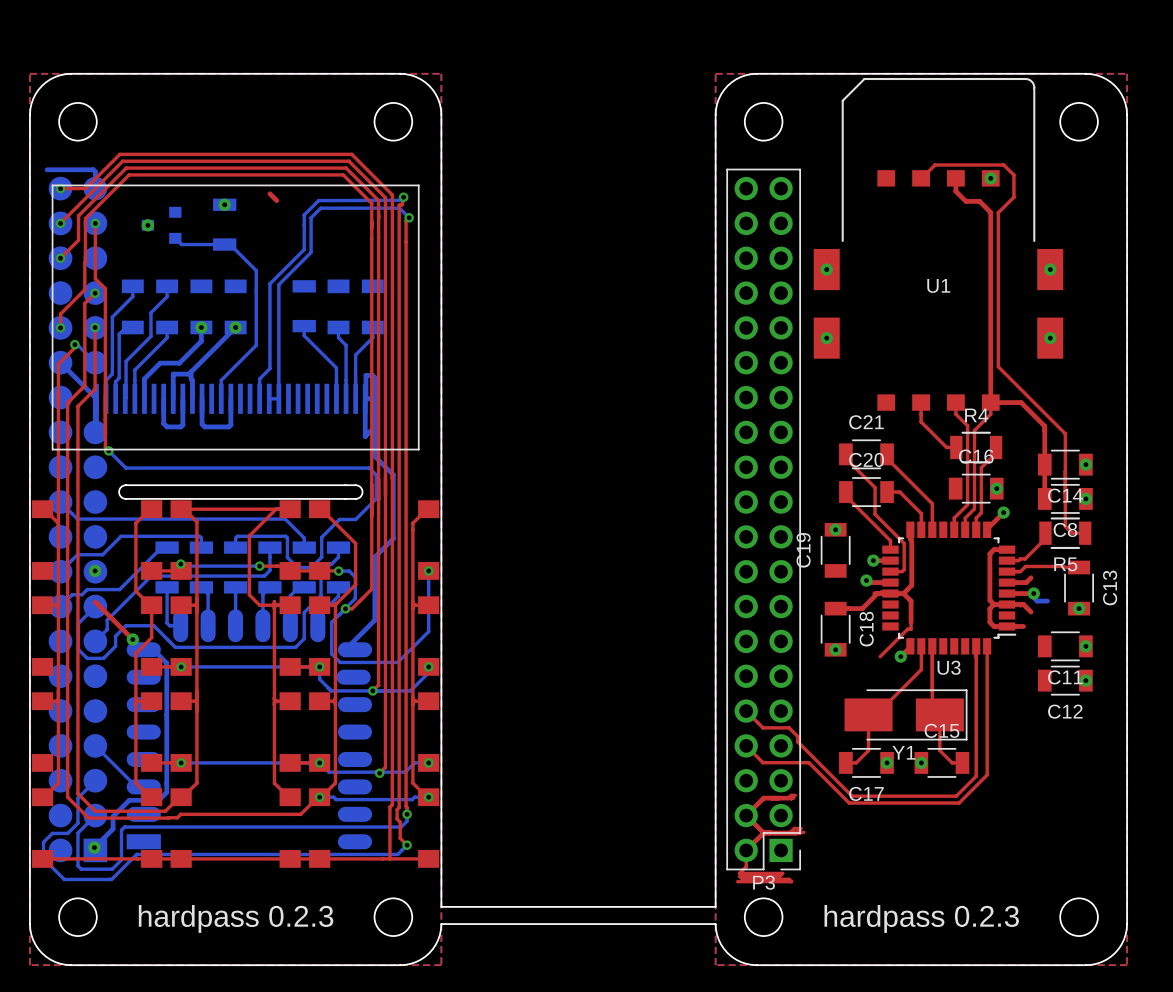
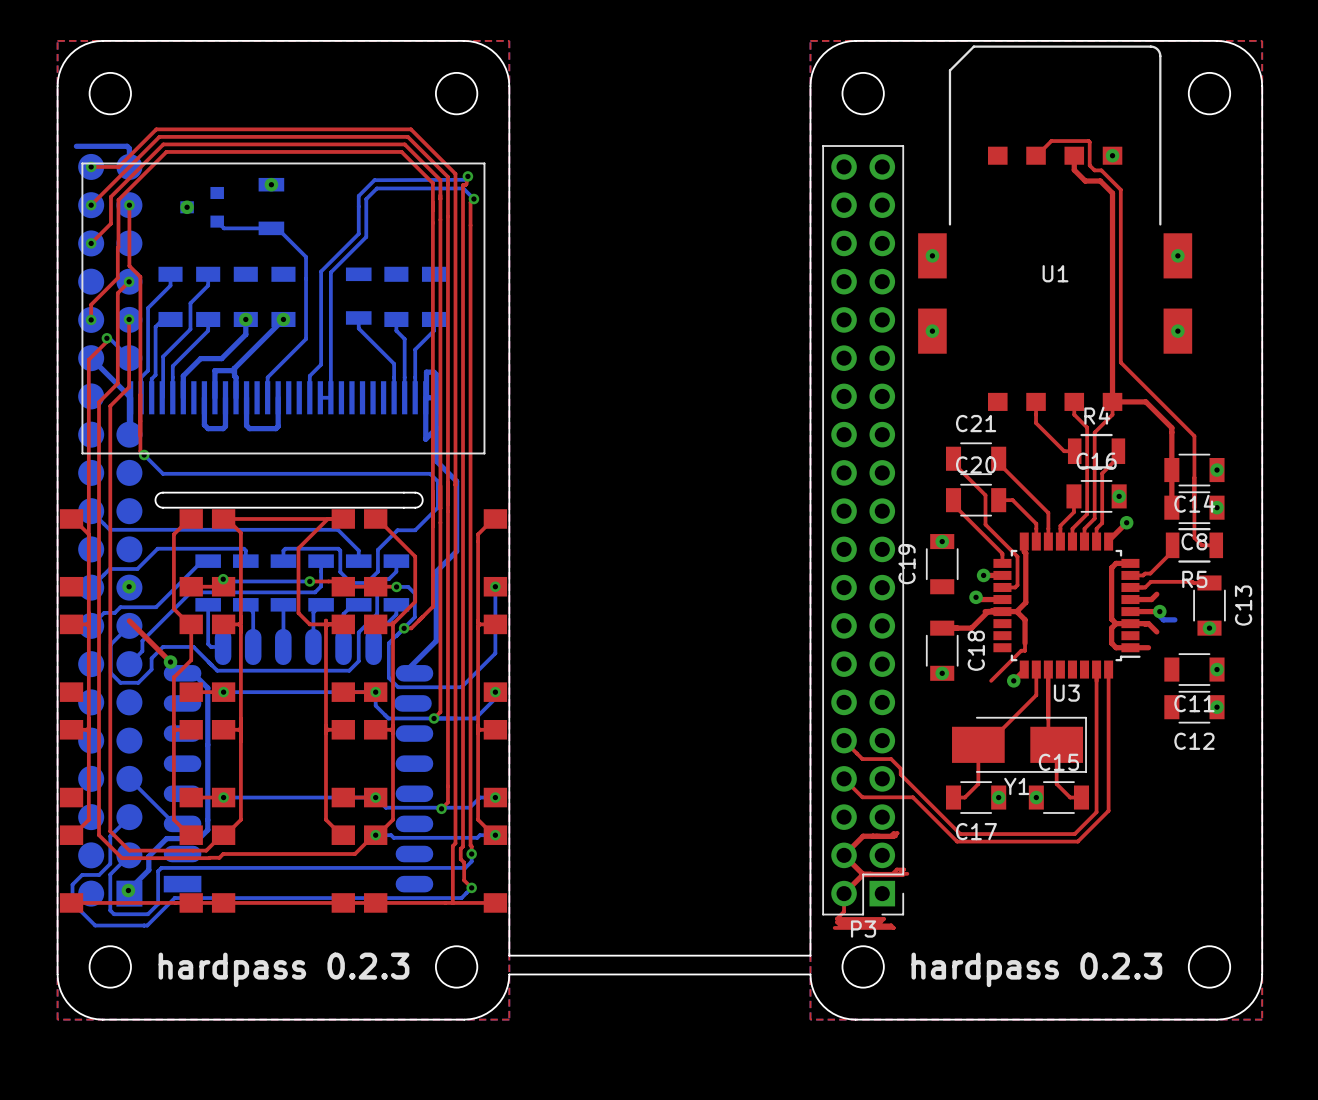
top track: (968, 164) (1003, 164) (1013, 175) (1013, 197) (998, 212) -> (1088, 141) (1089, 165) (1094, 170) (1101, 170) (1120, 189) (1120, 193)
top track: (269, 193) (276, 200) -> none
top track: none -> (1073, 496) (1073, 512) (1060, 525) (1060, 541)

